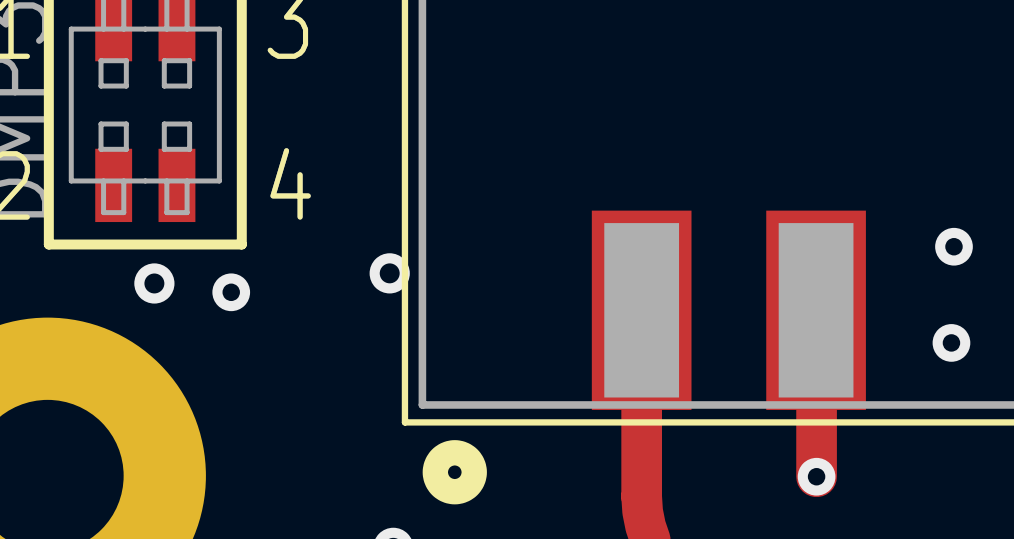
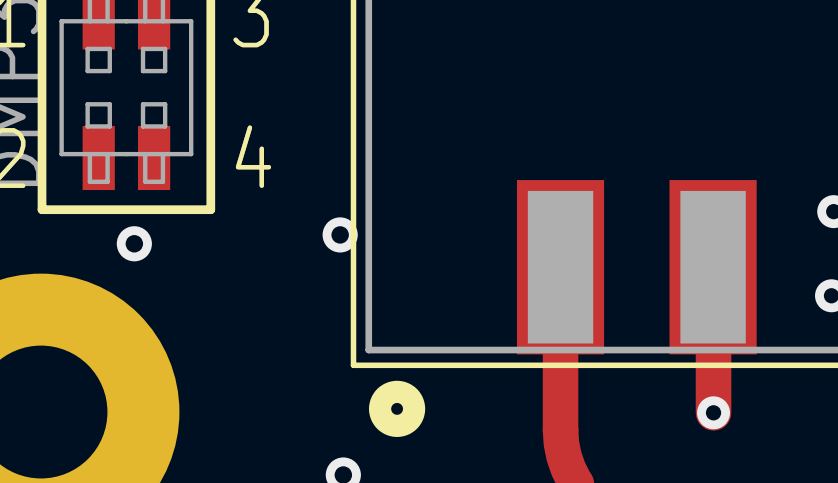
via: (231, 292) -> none

